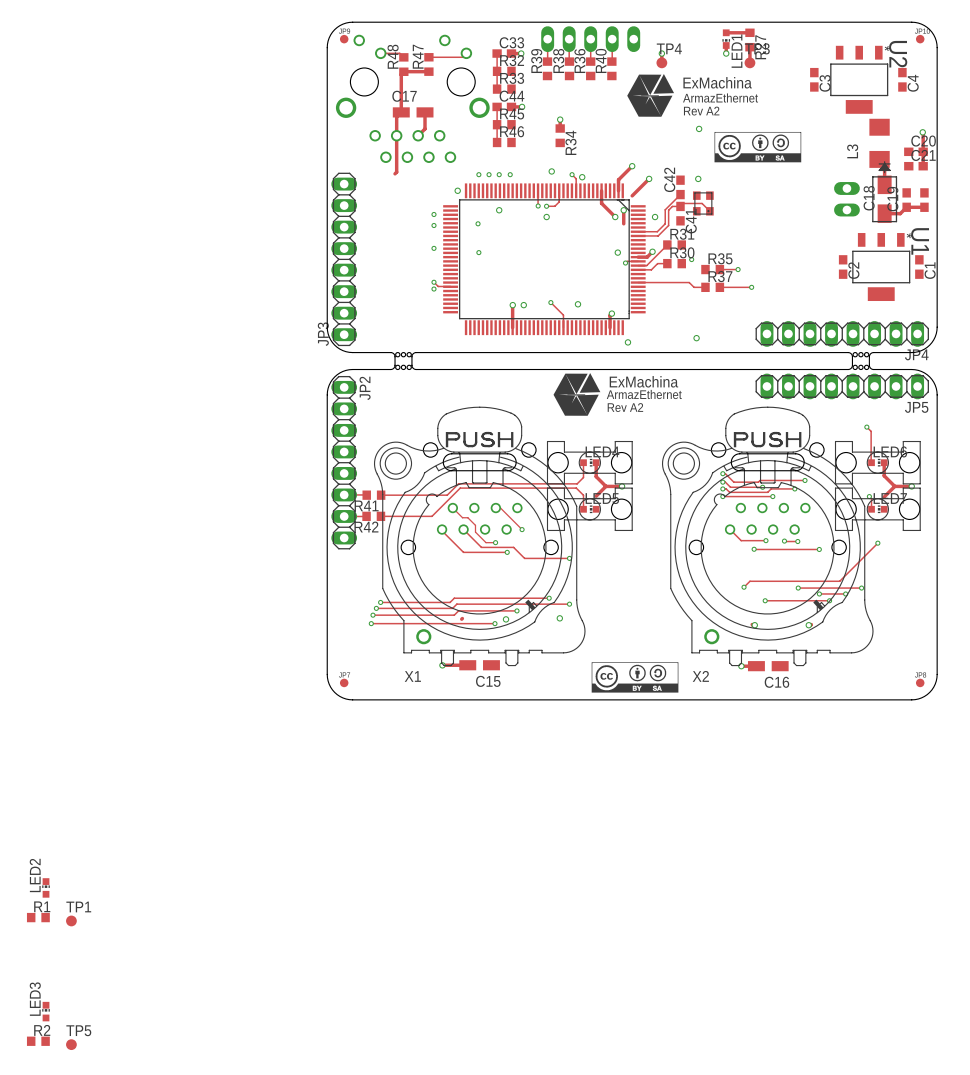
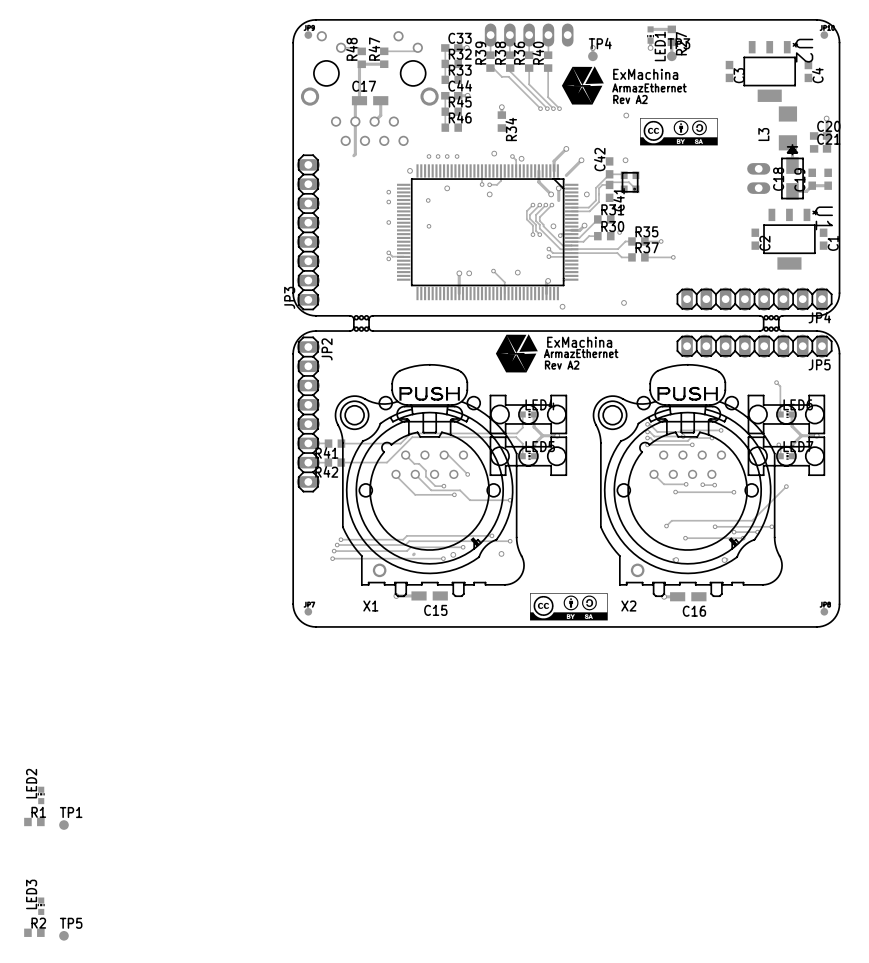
track: none -> (490, 68) (493, 68) (501, 76) (508, 76) (540, 108)
track: none -> (510, 68) (510, 71) (547, 108)
track: none -> (529, 68) (529, 84) (553, 108)
track: none -> (548, 68) (548, 97) (559, 108)
via: none -> (540, 108)
via: none -> (547, 108)
via: none -> (553, 108)
via: none -> (559, 108)
track: none -> (609, 174) (624, 175)
track: none -> (532, 205) (526, 211) (526, 219) (532, 225) (532, 234)
via: none -> (532, 205)
track: none -> (539, 205) (529, 214) (529, 218) (535, 224) (535, 230) (539, 234)
via: none -> (539, 205)
track: none -> (545, 205) (535, 214) (535, 220) (539, 224) (539, 228) (560, 249) (617, 249) (625, 241) (631, 241)
via: none -> (545, 205)
track: none -> (551, 205) (539, 217) (539, 220) (562, 245) (571, 245)
via: none -> (551, 205)
via: none -> (532, 234)
via: none -> (539, 234)
track: none -> (548, 249) (552, 253) (571, 253)
via: none -> (548, 249)
track: none -> (548, 256) (571, 256)
via: none -> (548, 256)

